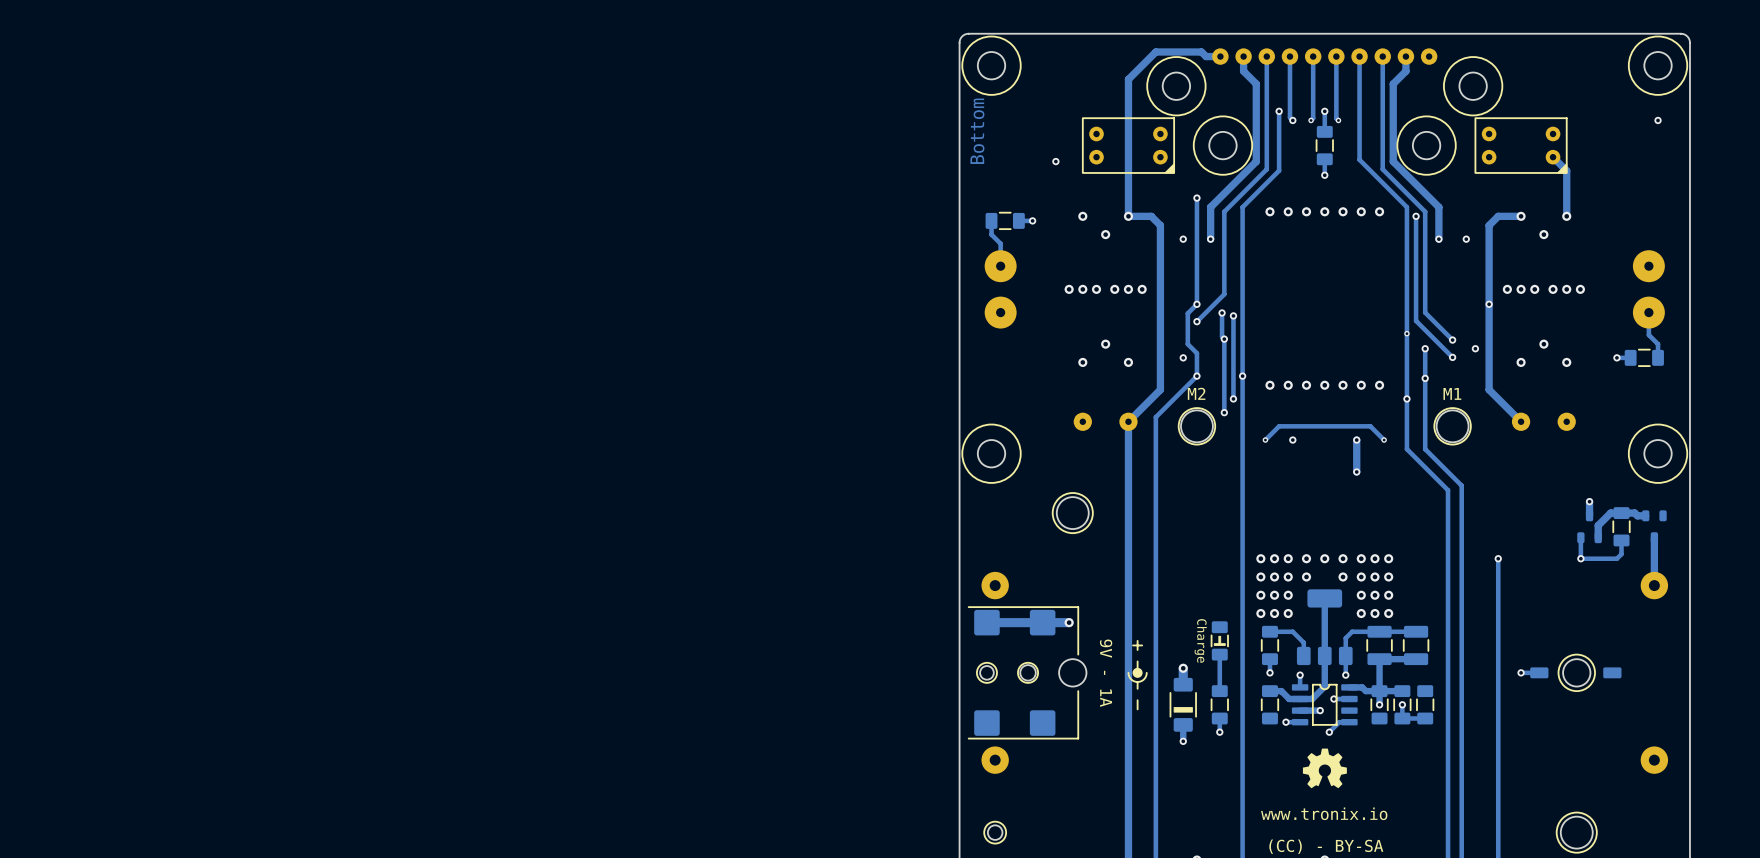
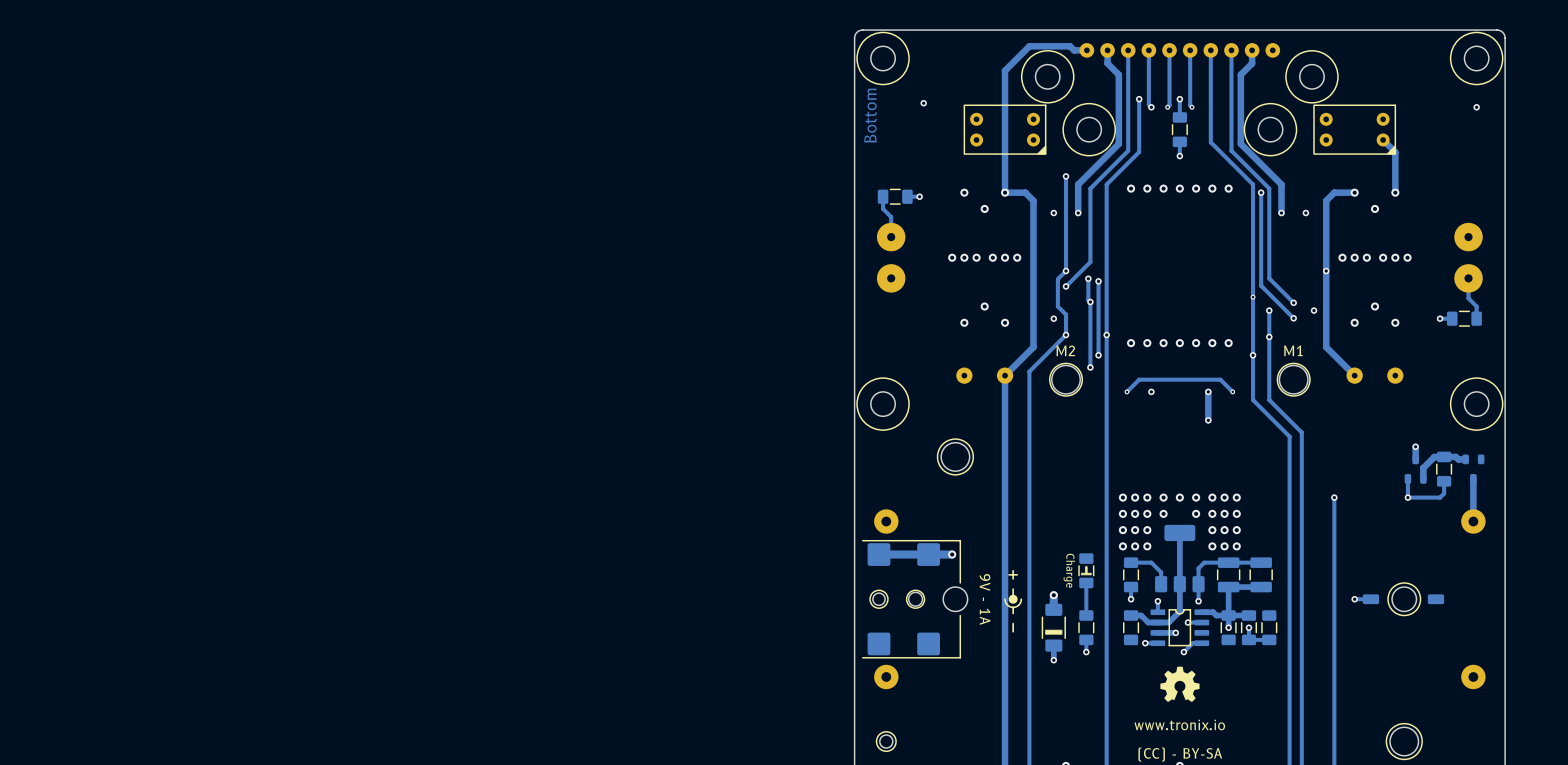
via position: (1055, 161) -> (923, 103)

